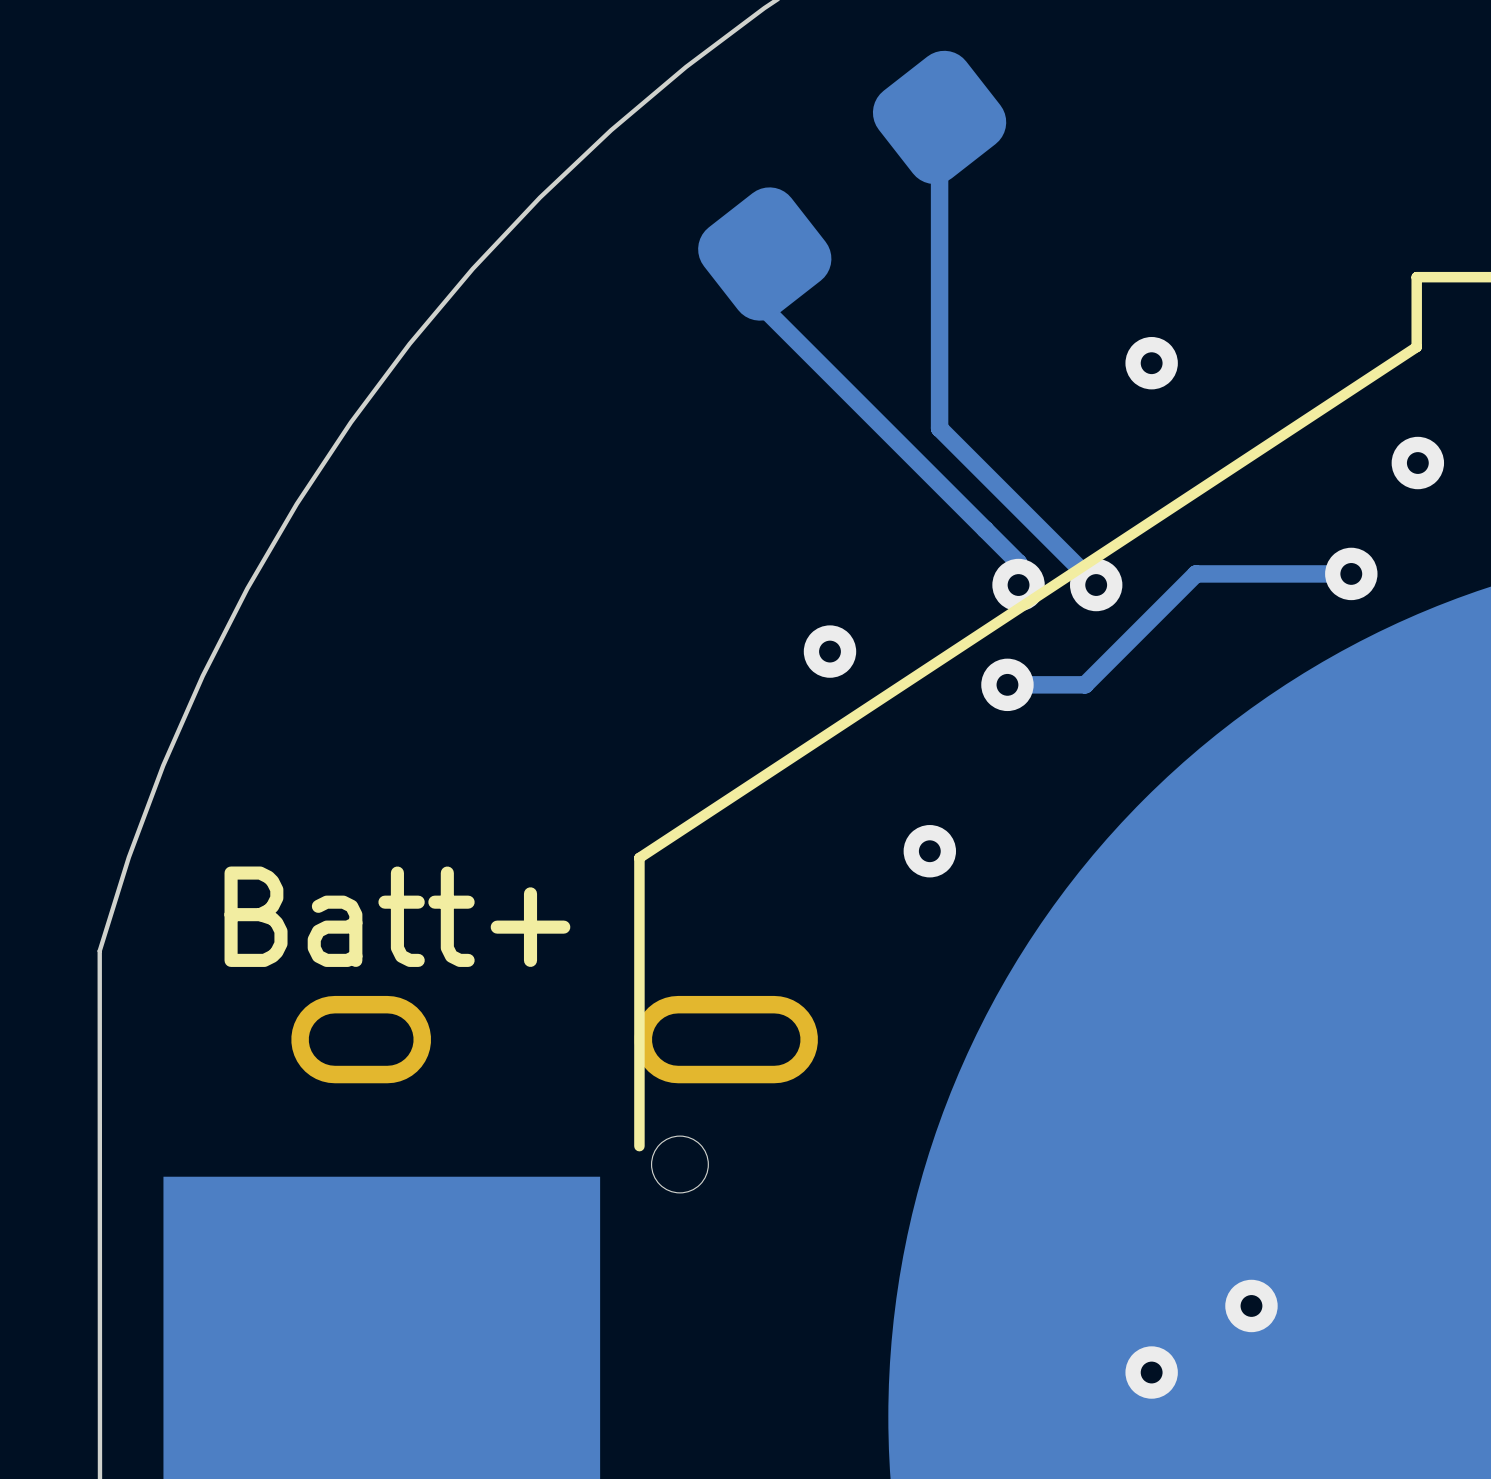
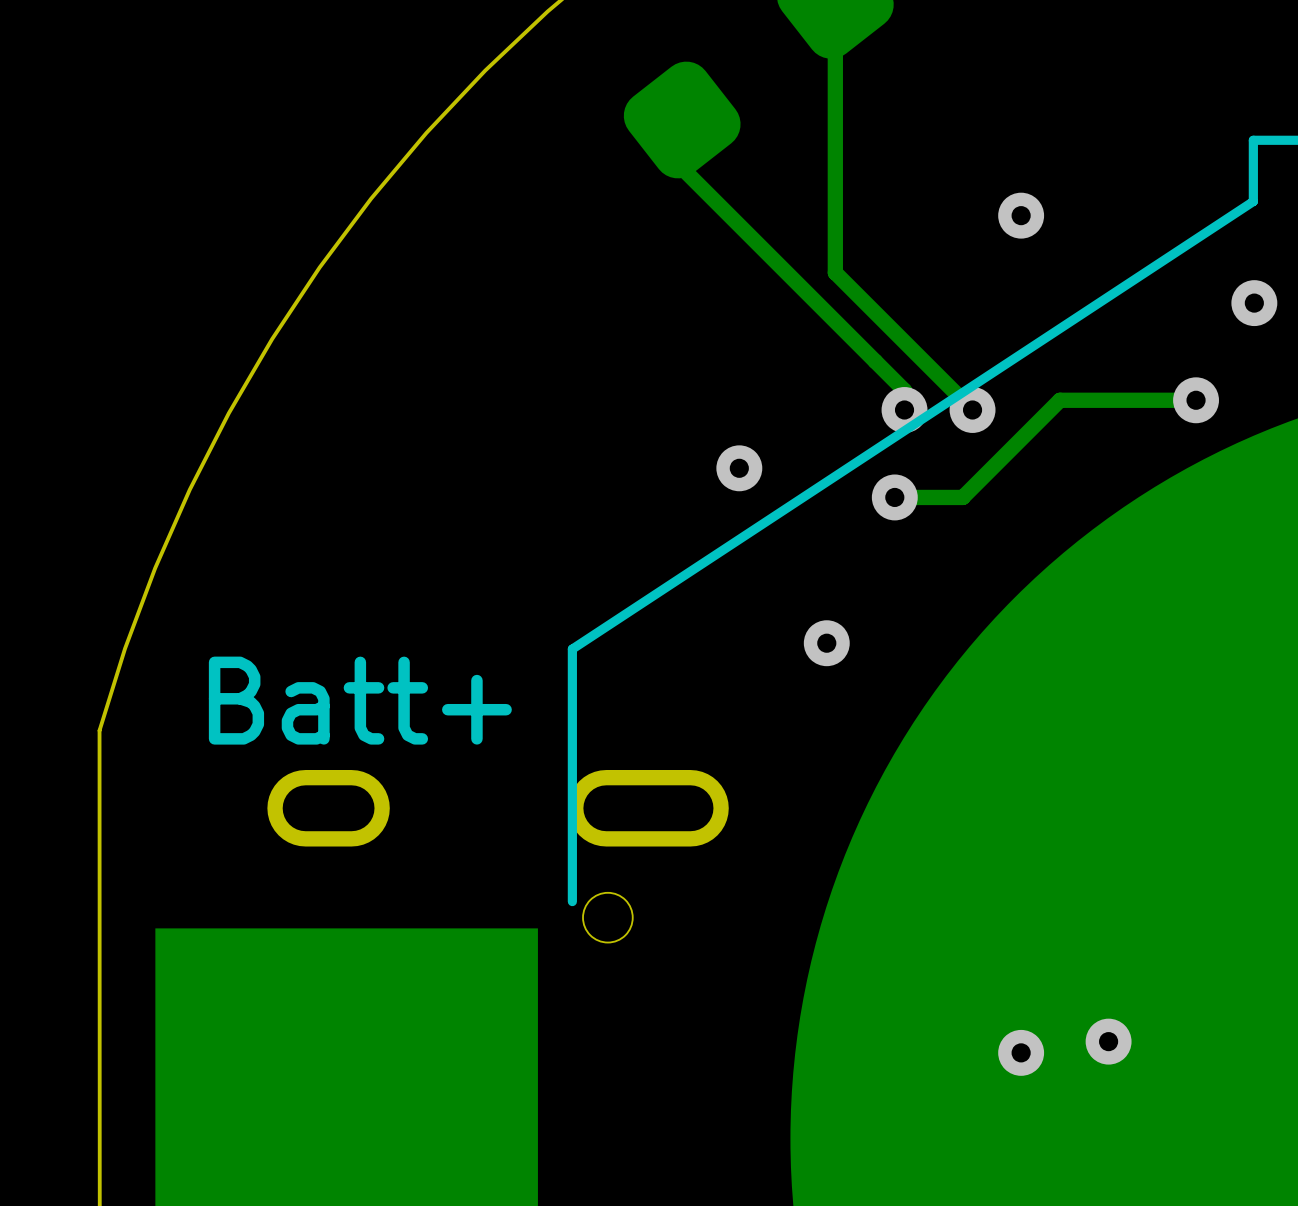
via position: (1151, 1372) -> (1021, 1052)

